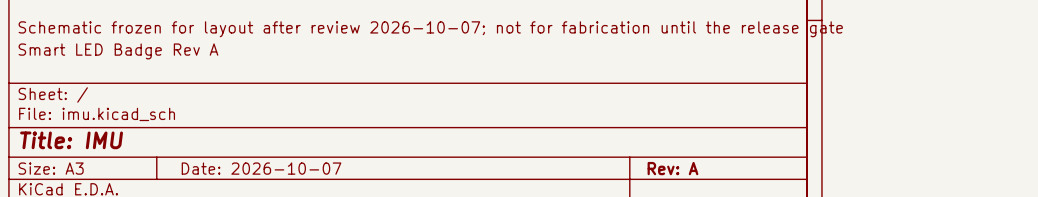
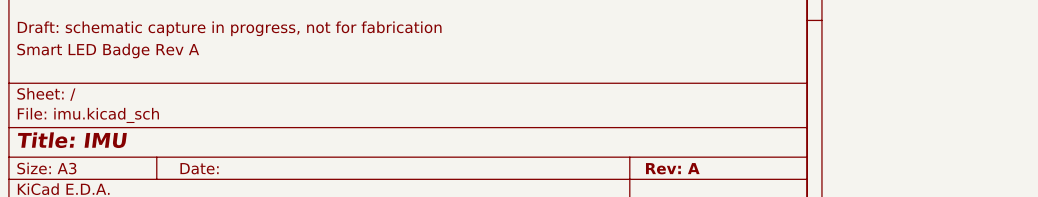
title block: Schematic frozen for layout after review 2026-10-07; not for fabrication until the release gate (430, 29) -> Draft: schematic capture in progress, not for fabrication (229, 28)
title block: Date: 2026-10-07 (261, 168) -> Date: (199, 168)

